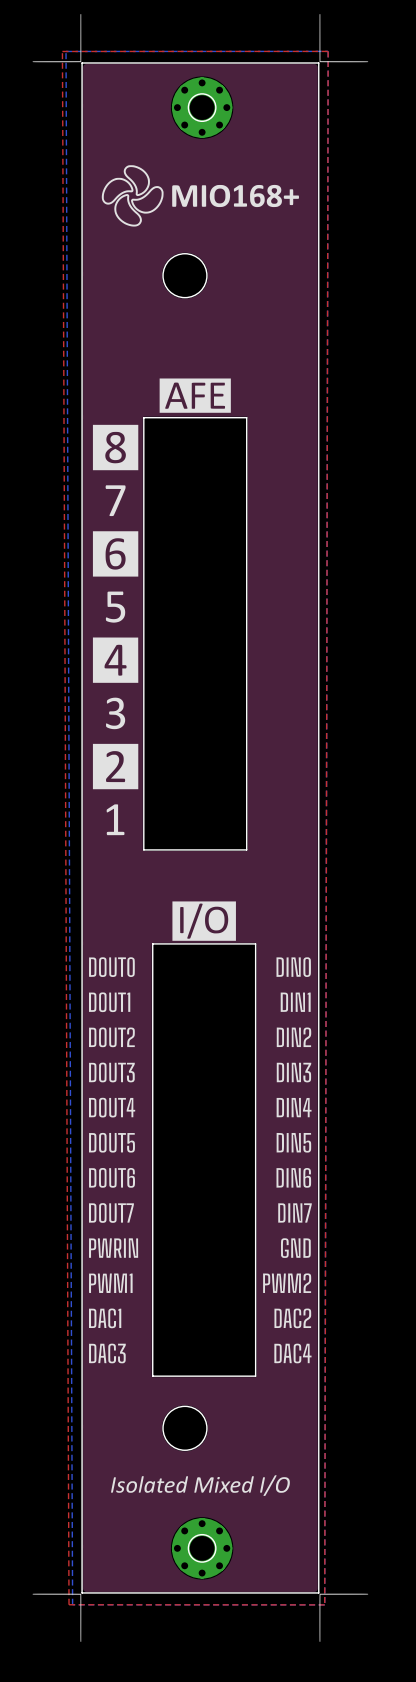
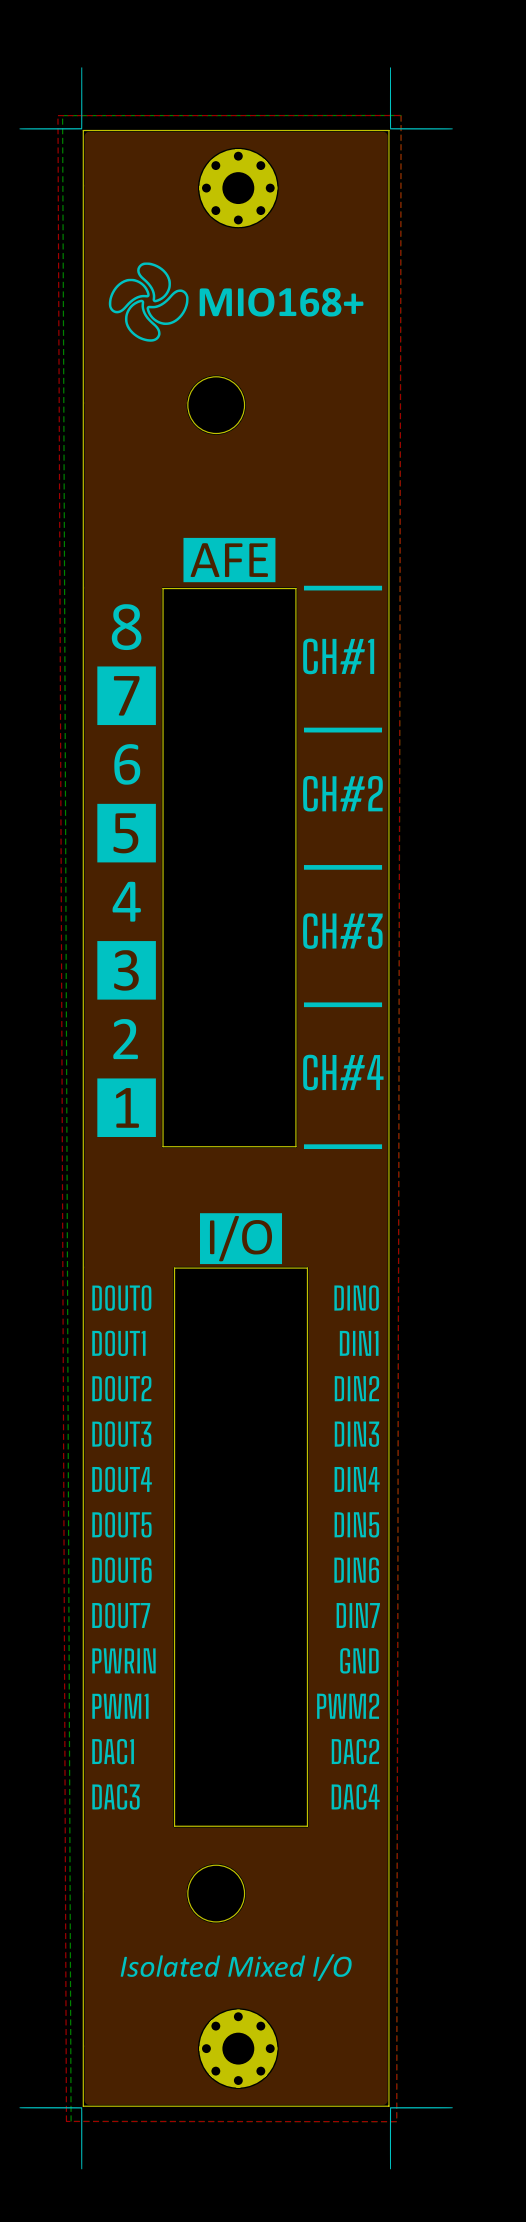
drawing shape: [32, 14, 369, 1642] -> [19, 67, 453, 2170]

